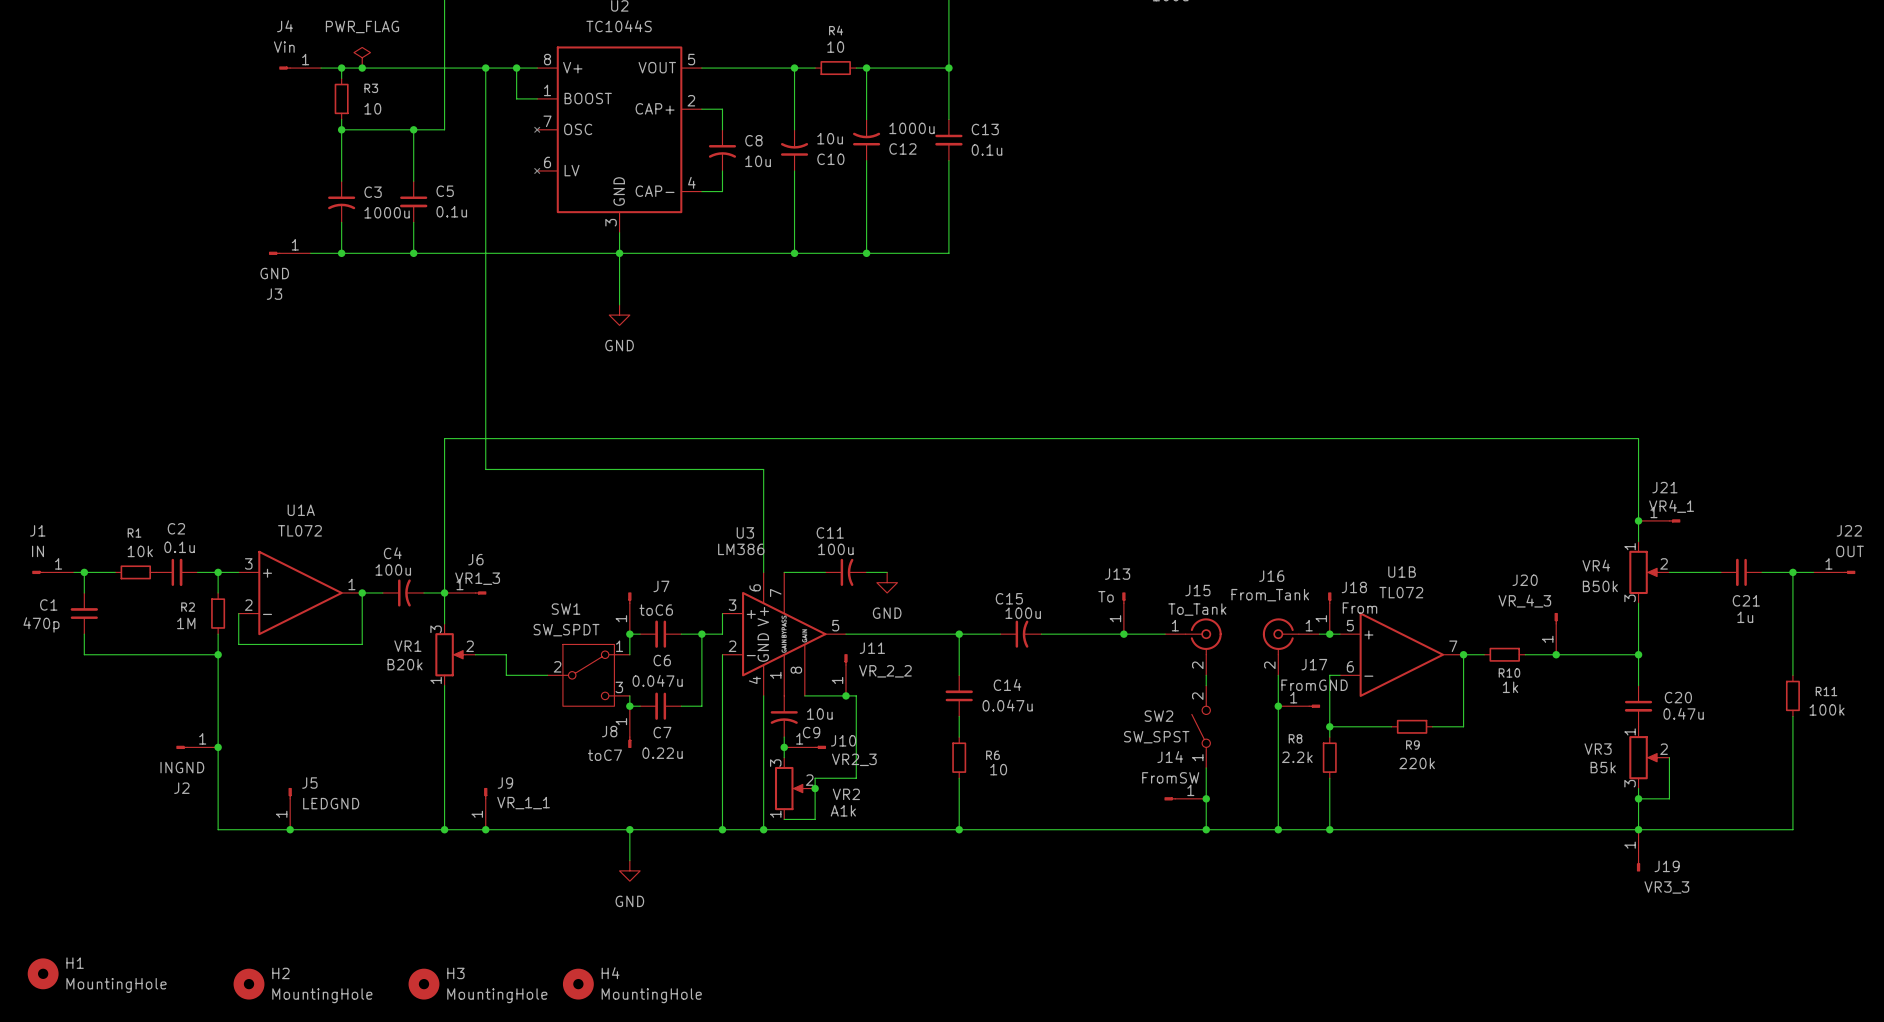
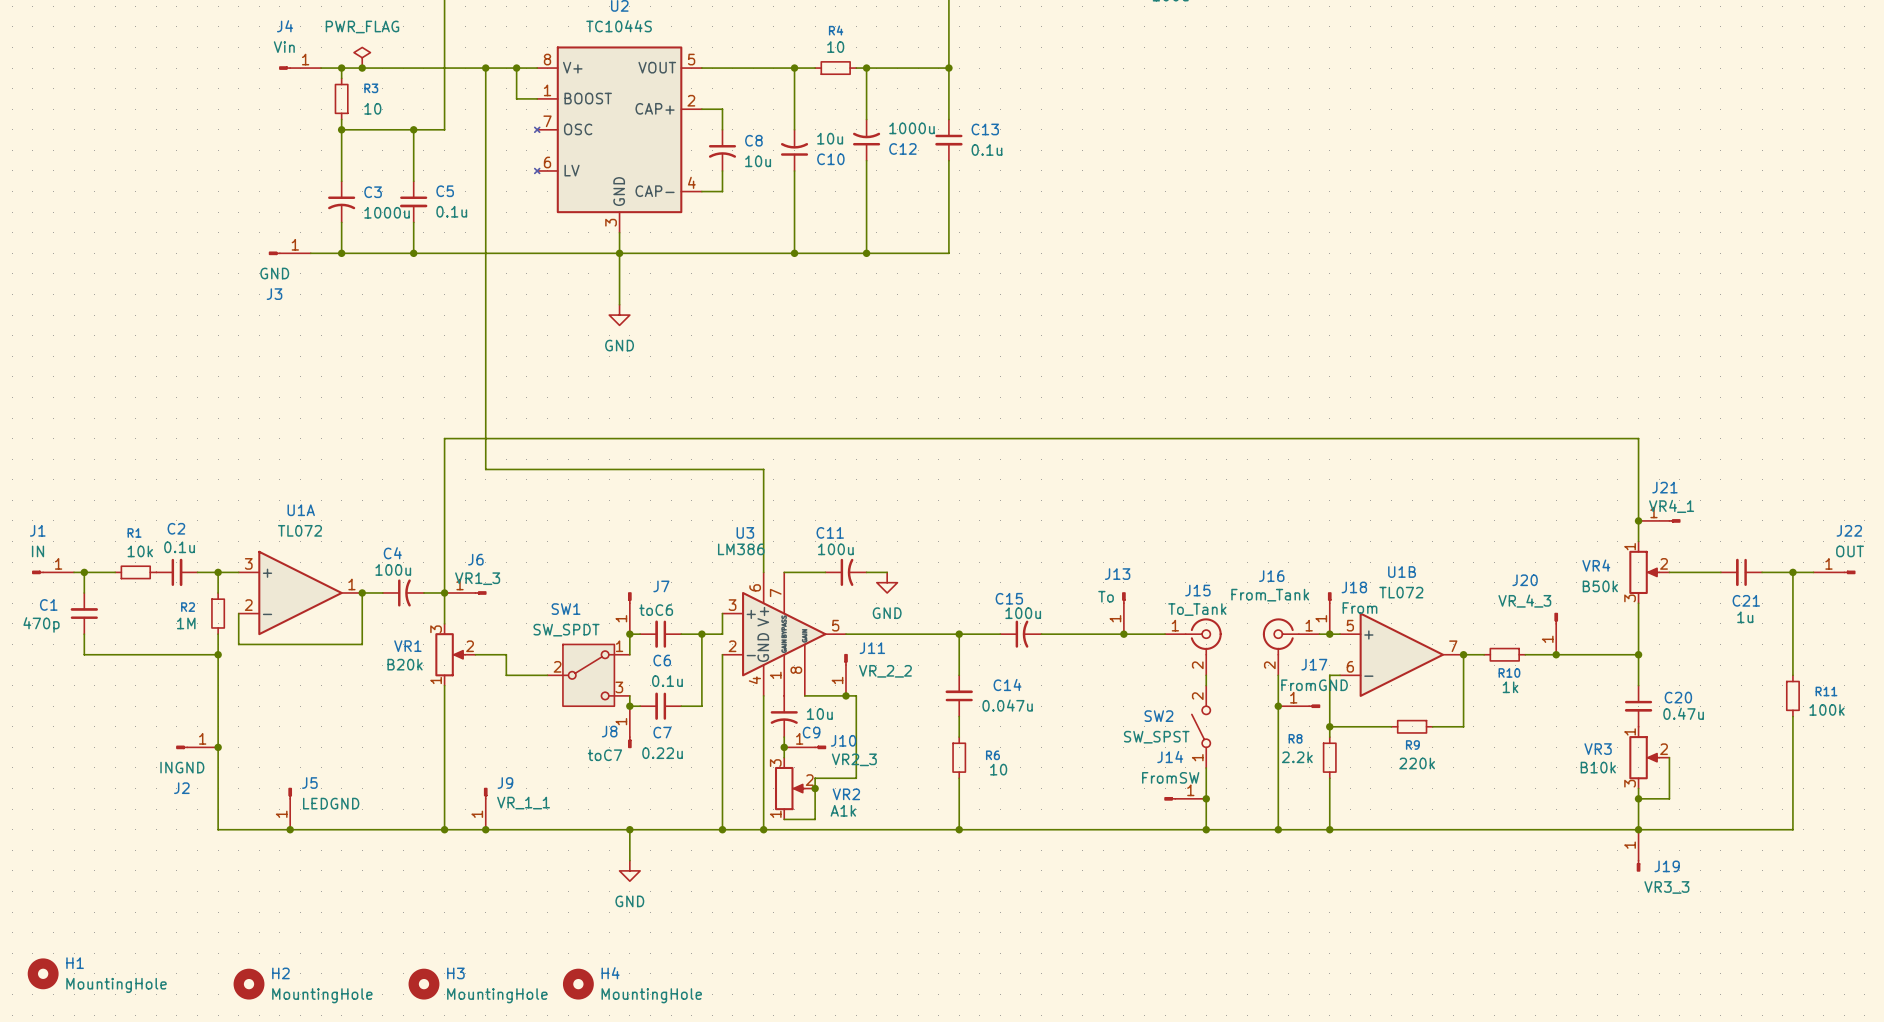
C6 value: 0.047u (657, 680) -> 0.1u (667, 681)
VR3 value: B5k (1603, 767) -> B10k (1598, 767)

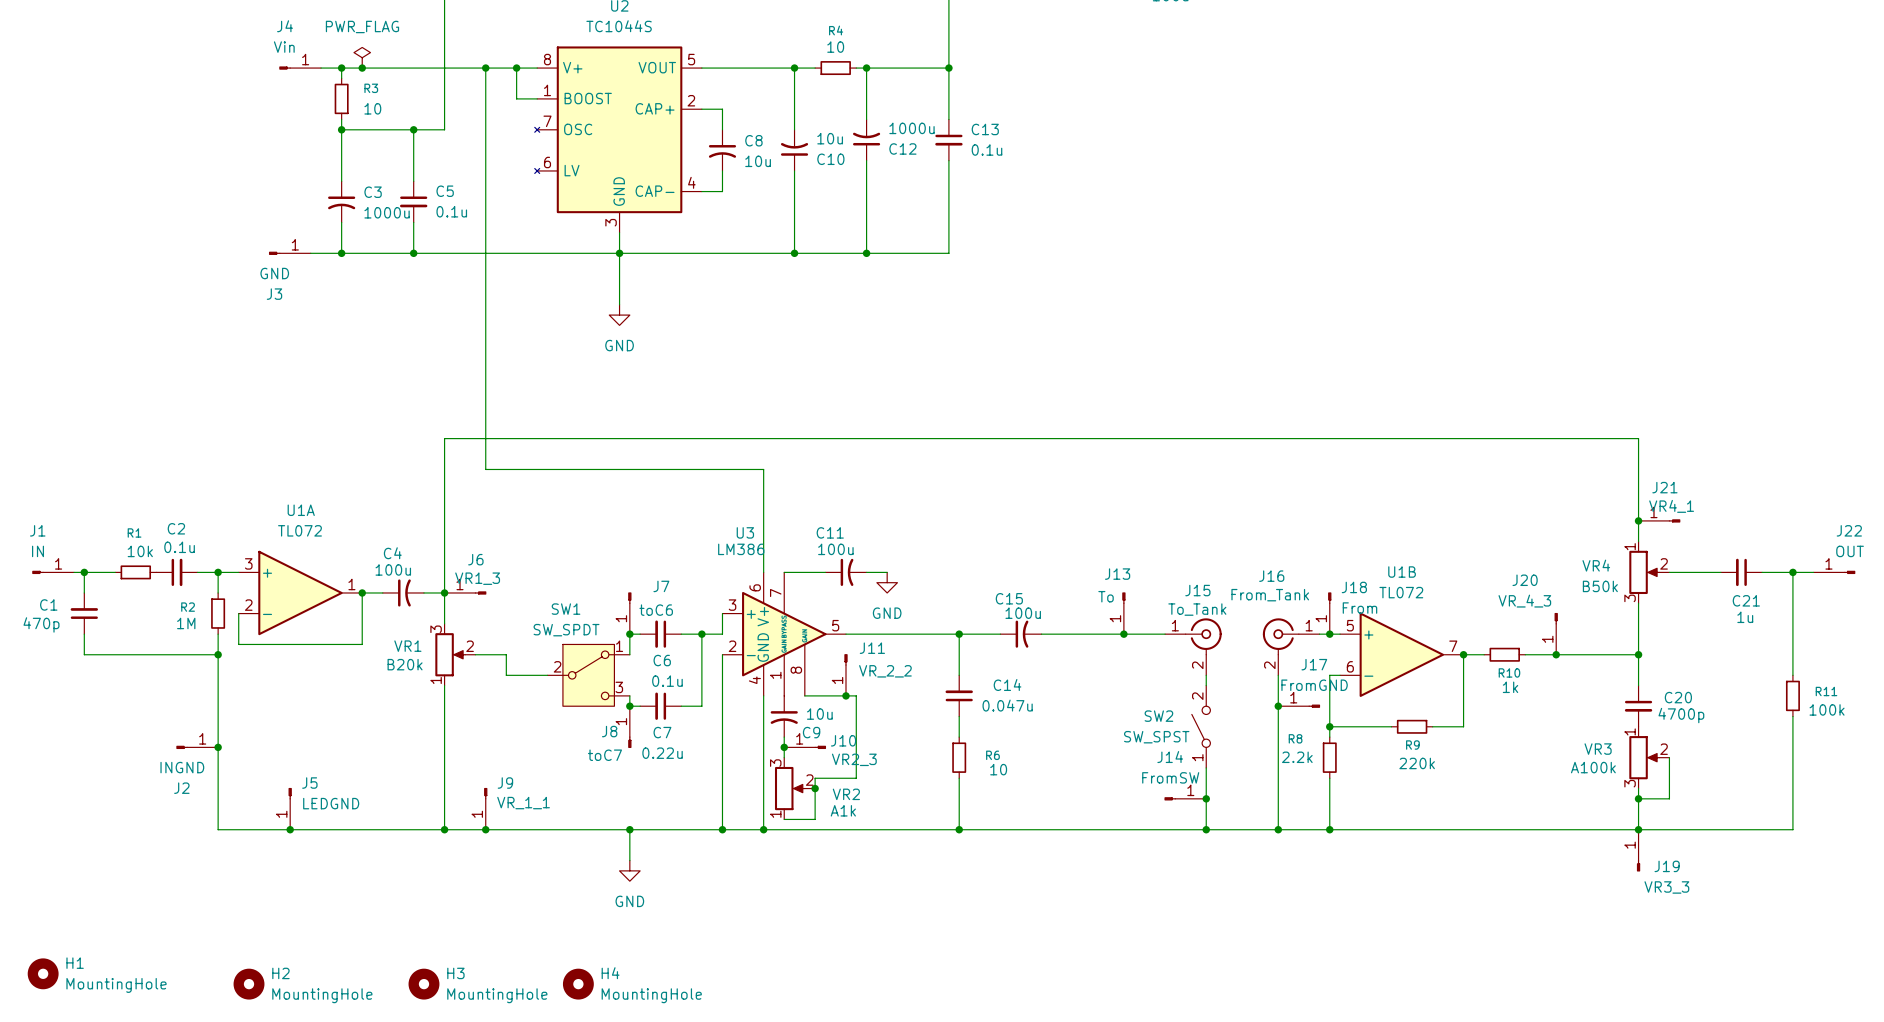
C20 value: 0.47u (1683, 713) -> 4700p (1681, 715)
VR3 value: B10k (1598, 767) -> A100k (1593, 767)

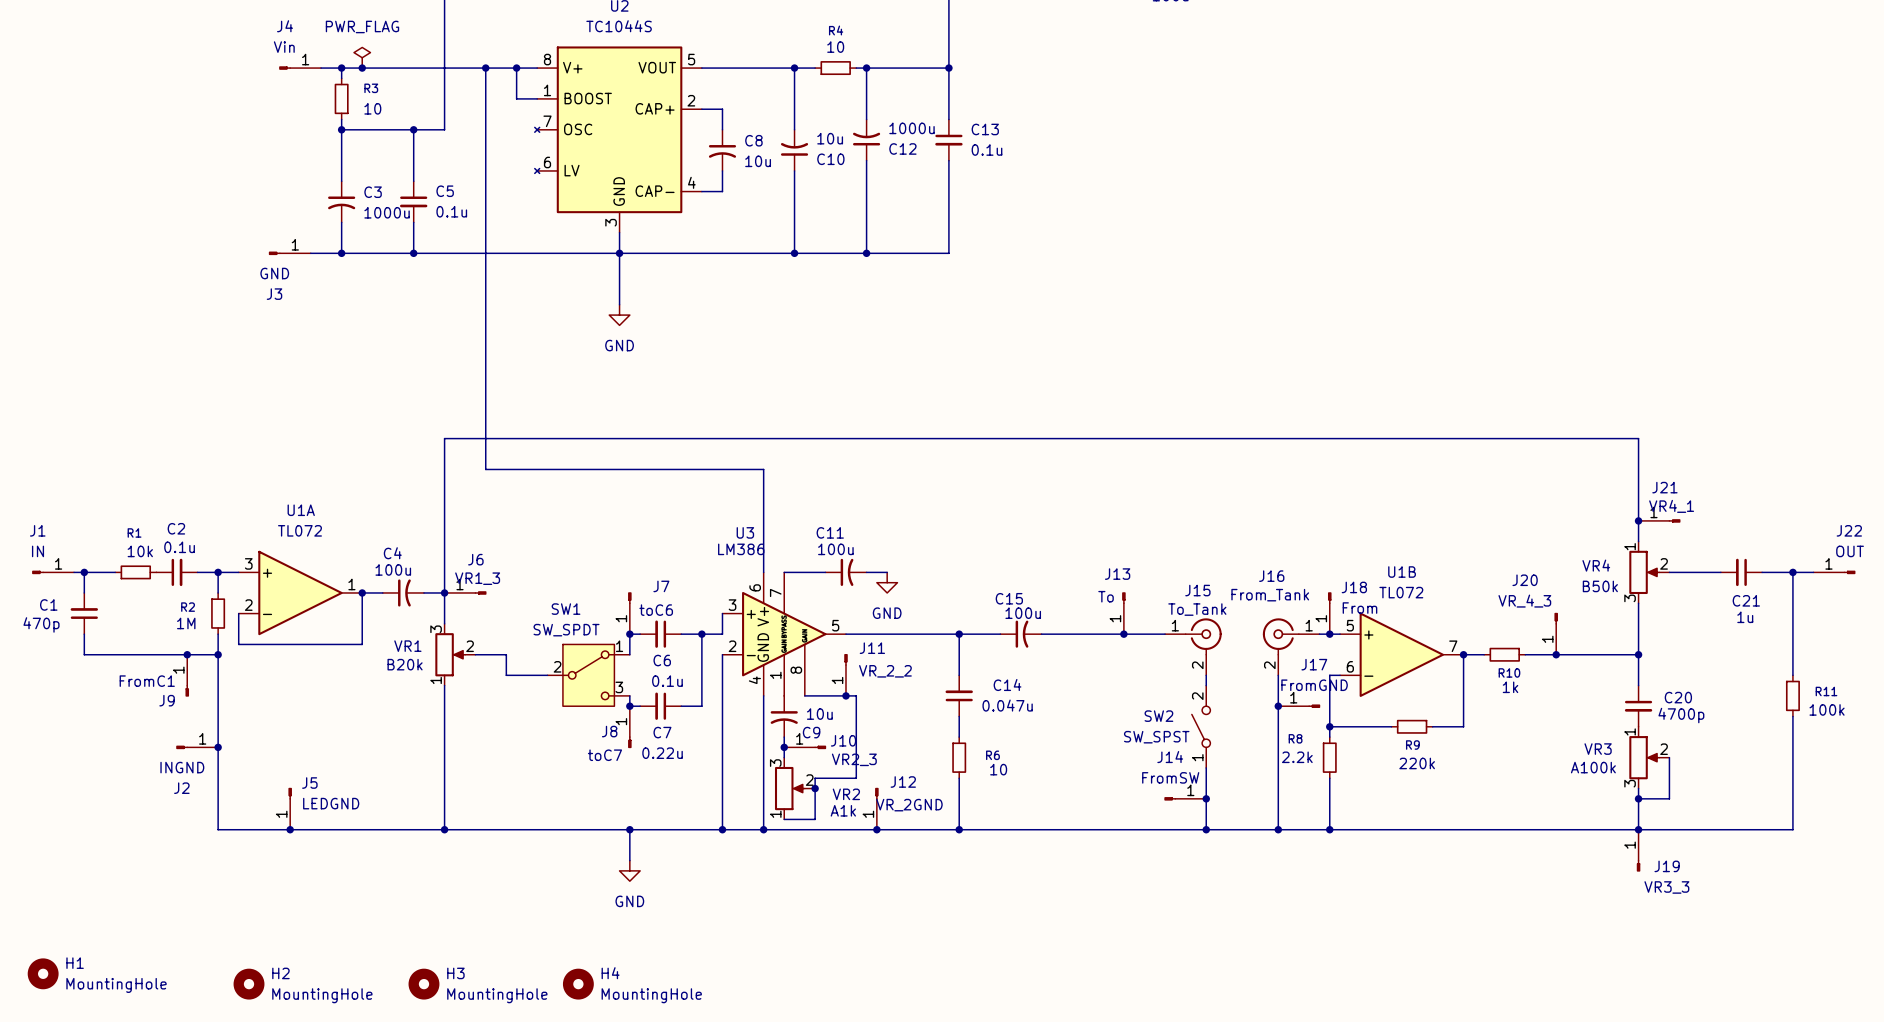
junction: none -> (187, 654)
J9 rotation: 0° (485, 793) -> 180° (187, 690)
J9 value: VR_1_1 (523, 803) -> FromC1 (147, 681)
J9 position: (485, 808) -> (187, 675)
J12: none -> VR_2GND (876, 808)
junction: (485, 829) -> none
junction: none -> (876, 829)

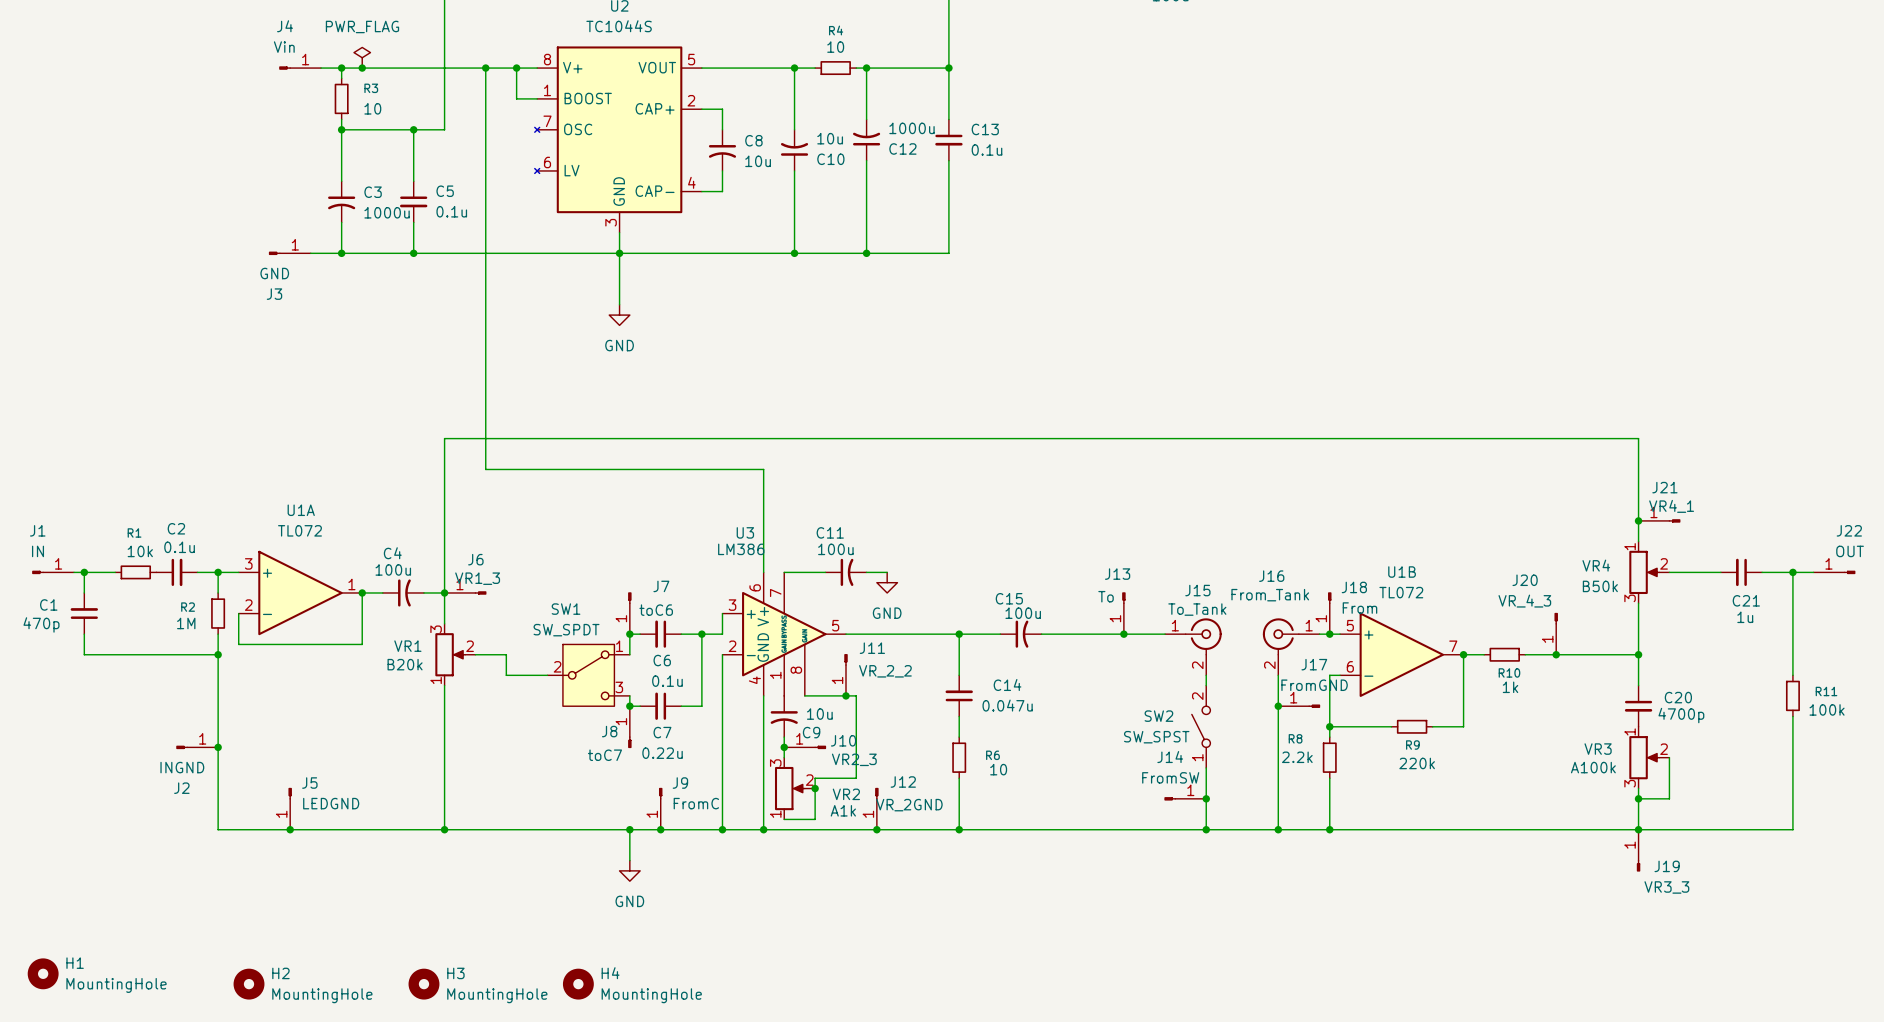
junction: (187, 654) -> none
J9 position: (187, 675) -> (660, 808)
J9 value: FromC1 (147, 681) -> FromC (696, 803)
J9 rotation: 0° (187, 690) -> 180° (660, 793)
junction: none -> (660, 829)

